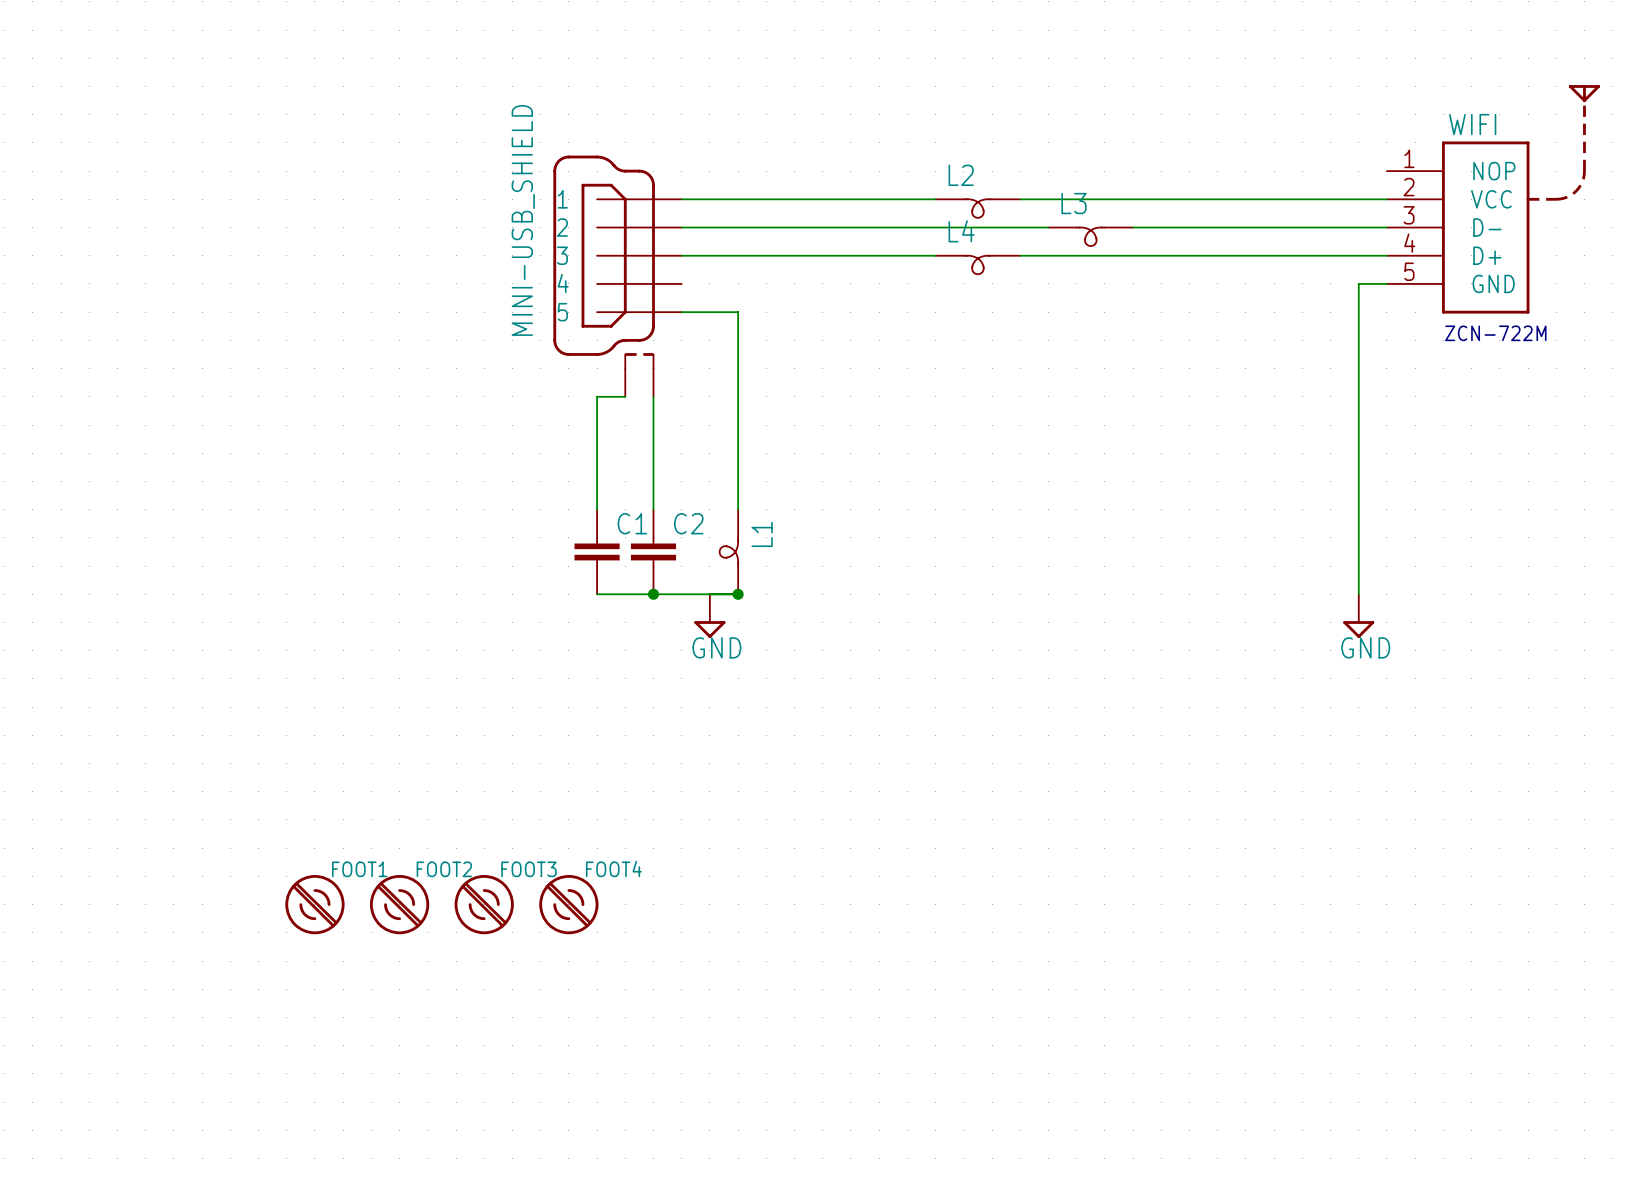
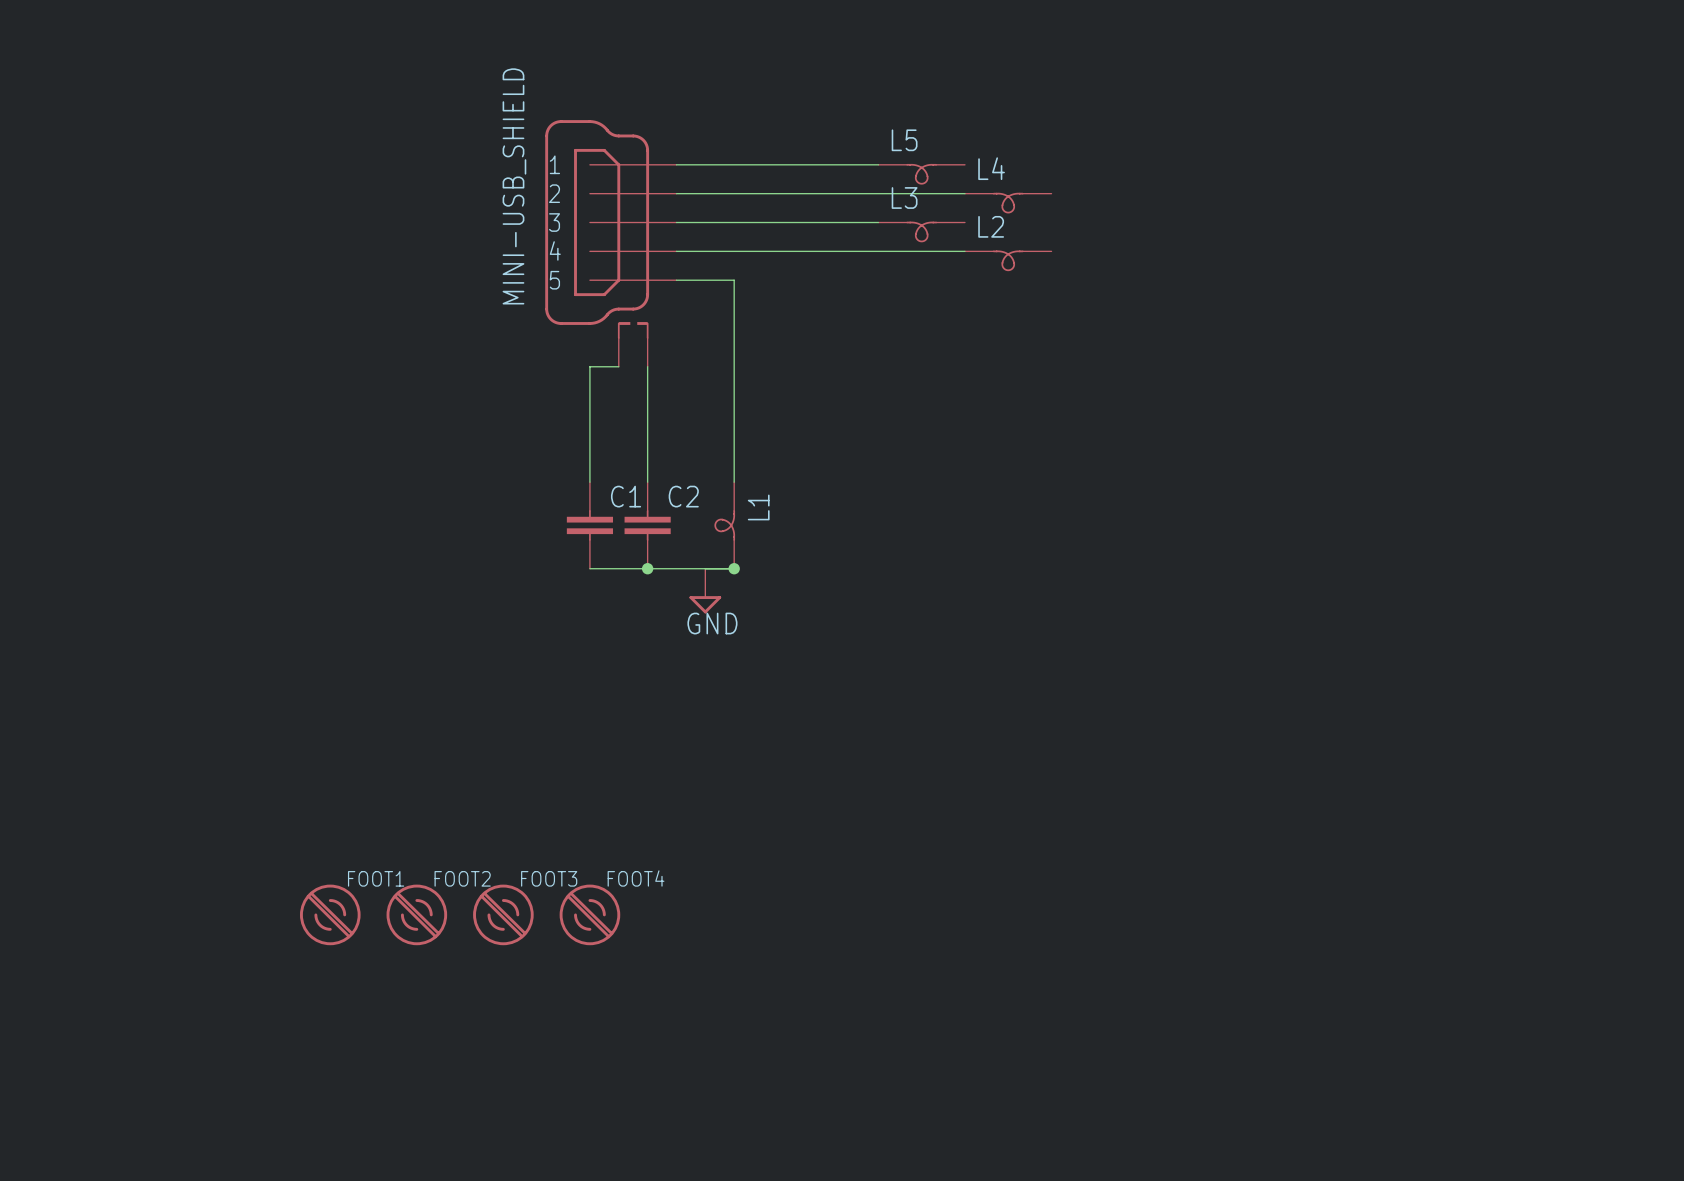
L2 name: L2 (961, 175) -> L4 (991, 168)
L5: none -> (921, 174)
wire: (1020, 199) (1386, 199) -> none
WIFI: (1493, 199) -> none
wire: (850, 227) (1048, 227) -> (676, 164) (878, 164)
wire: (1133, 227) (1386, 227) -> none
L4 name: L4 (961, 231) -> L2 (991, 226)
L3 position: (1090, 236) -> (921, 231)
part position: (617, 255) -> (610, 222)
wire: (1020, 255) (1386, 255) -> none
wire: (1386, 283) (1358, 283) (1358, 594) -> none
wire: (681, 312) (738, 312) (738, 509) -> (676, 280) (734, 280) (734, 482)
part position: (639, 374) -> (633, 344)
wire: (625, 396) (597, 396) (597, 509) -> (618, 366) (589, 366) (589, 482)
wire: (653, 396) (653, 509) -> (647, 366) (647, 482)
C1 position: (597, 551) -> (589, 525)
C2 position: (653, 551) -> (647, 525)
L1 position: (728, 551) -> (724, 525)
junction: none -> (647, 568)
junction: none -> (734, 568)
wire: (597, 594) (738, 594) -> (589, 568) (734, 568)
junction: (653, 594) -> none
junction: (738, 594) -> none
power symbol position: GND (709, 616) -> GND (705, 591)
power symbol: GND (1358, 616) -> none

